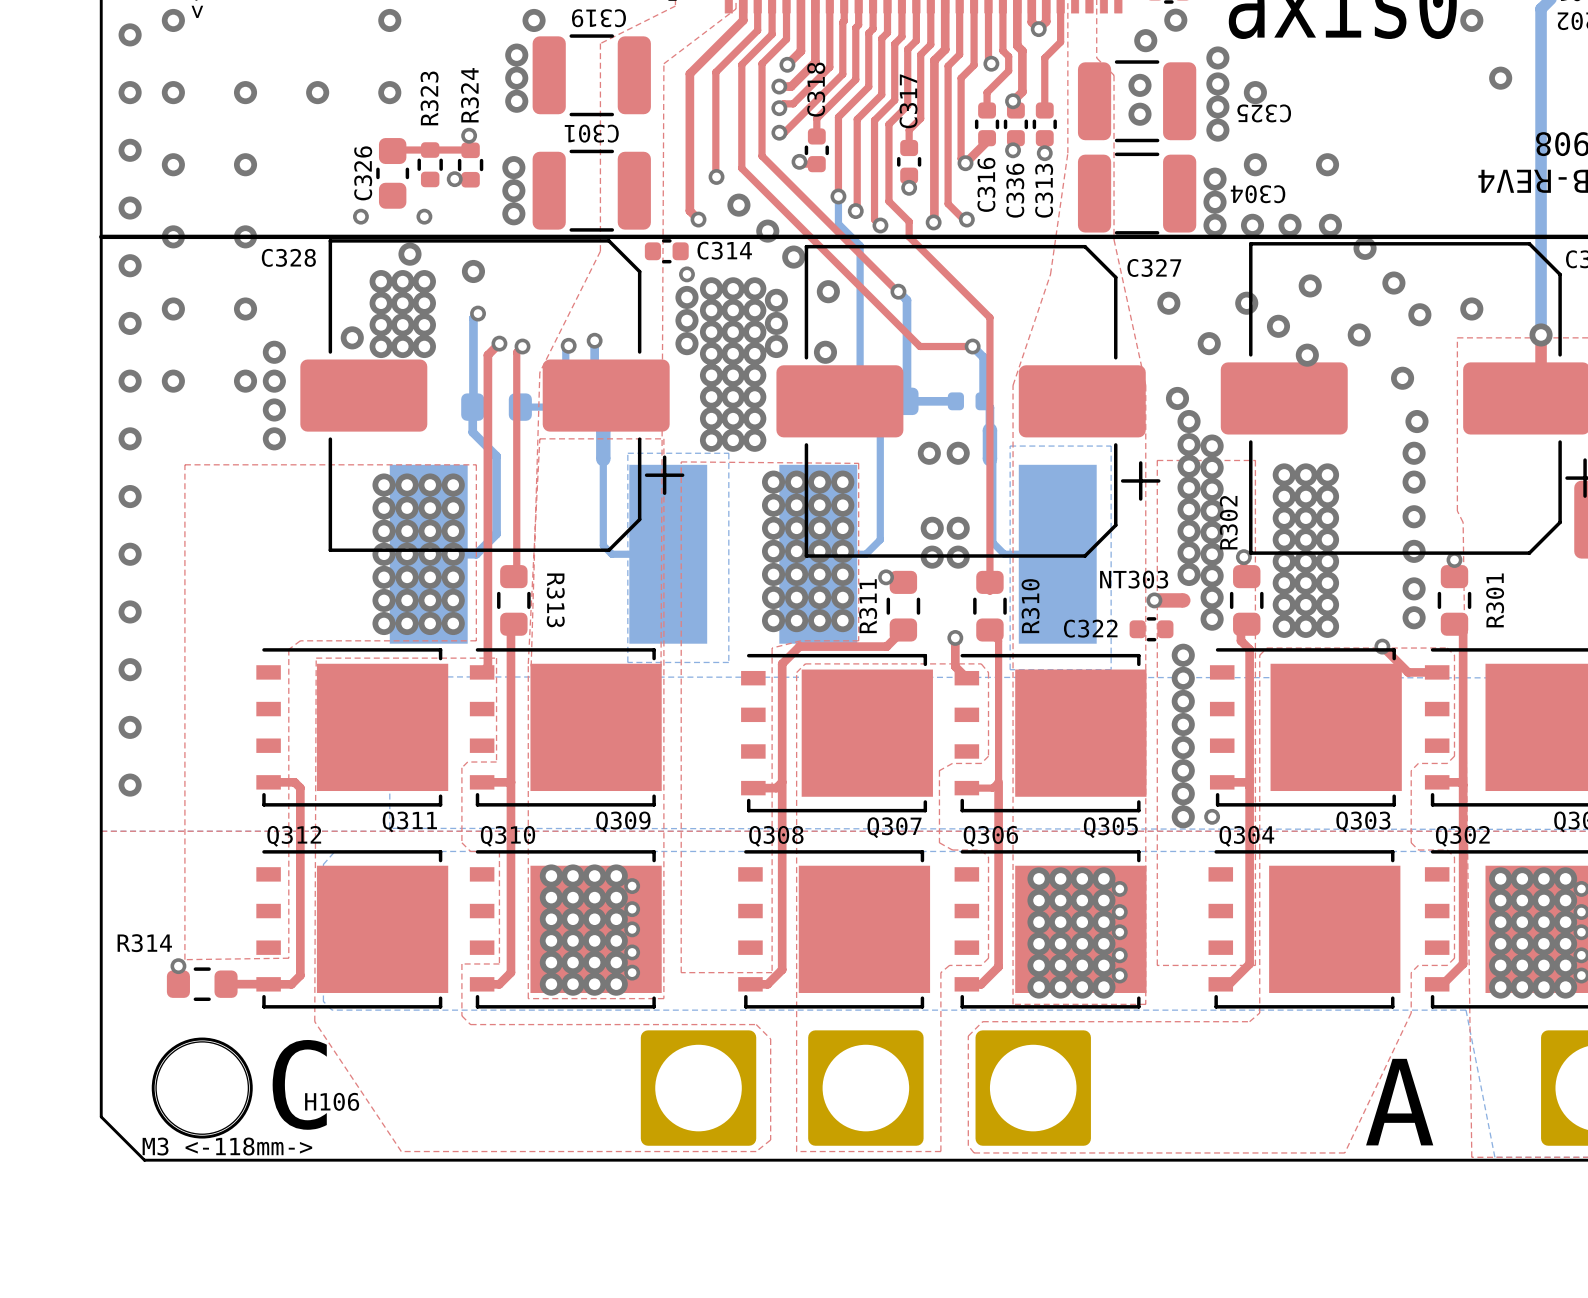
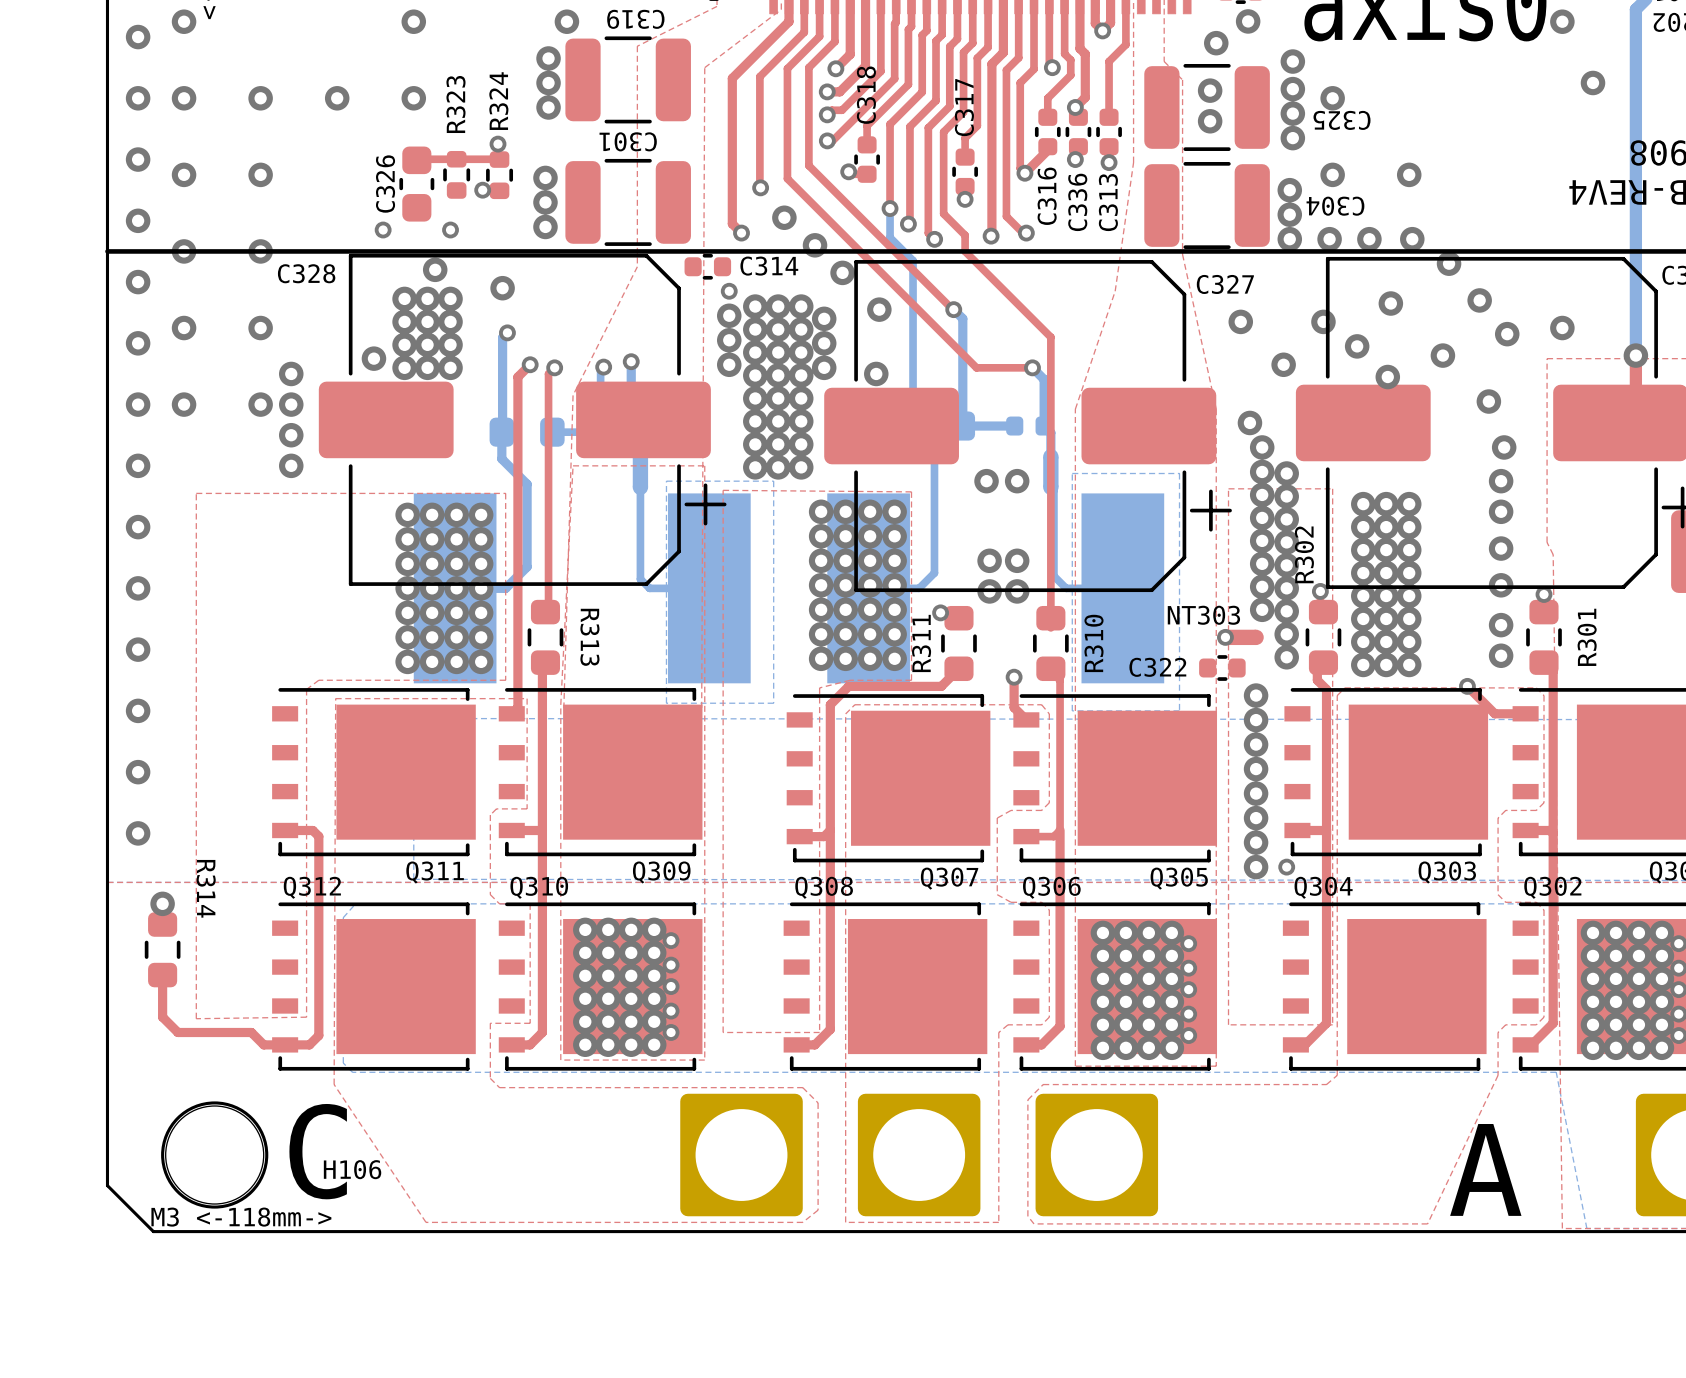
via: none -> (162, 903)
via: (178, 966) -> none
R314 rotation: 0° (202, 984) -> 90° clockwise (162, 949)
R314 position: (202, 984) -> (162, 949)
top track: (226, 984) (268, 984) -> (162, 975) (162, 1017) (177, 1032) (251, 1032) (263, 1044) (285, 1044)

